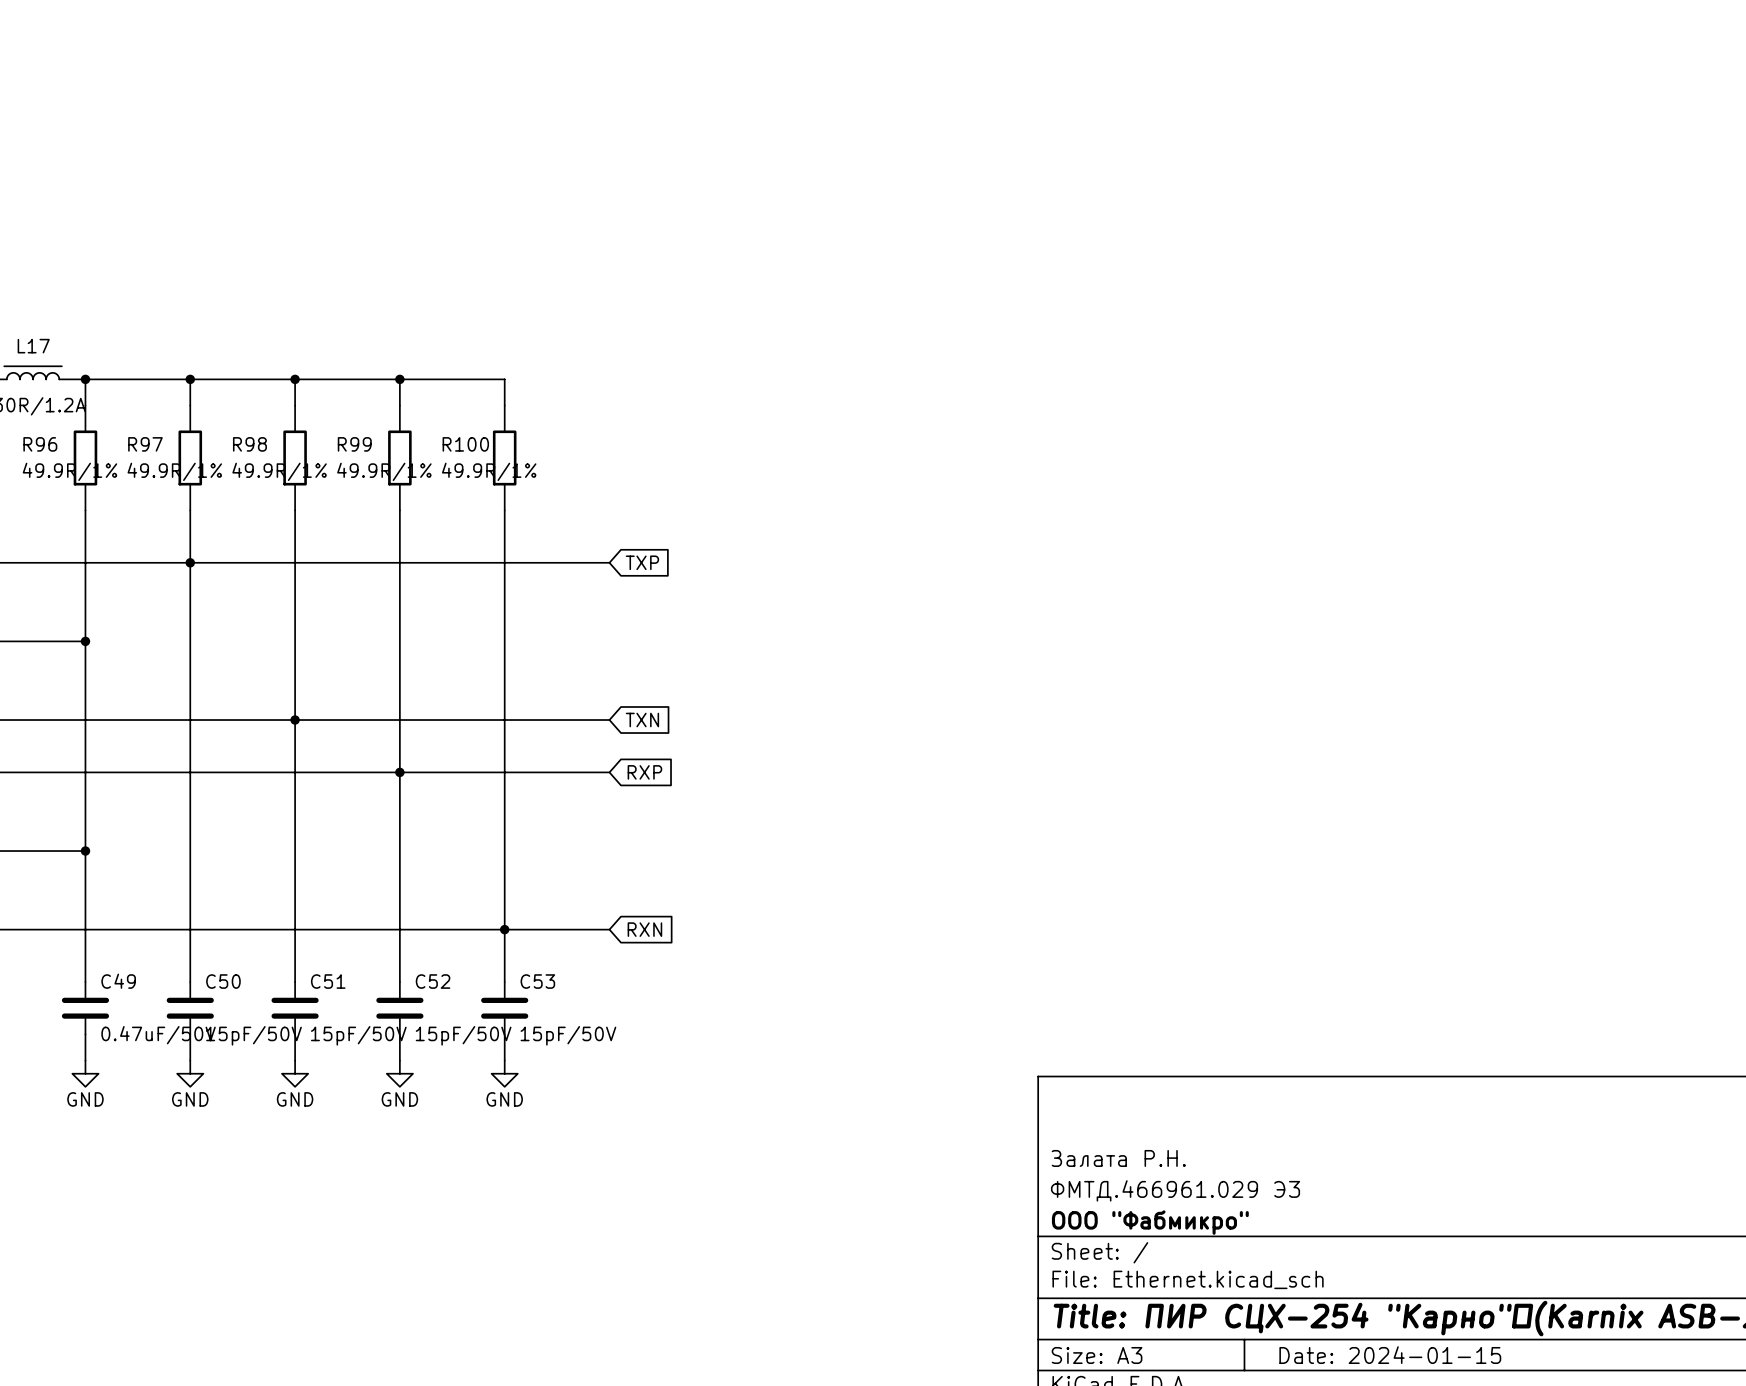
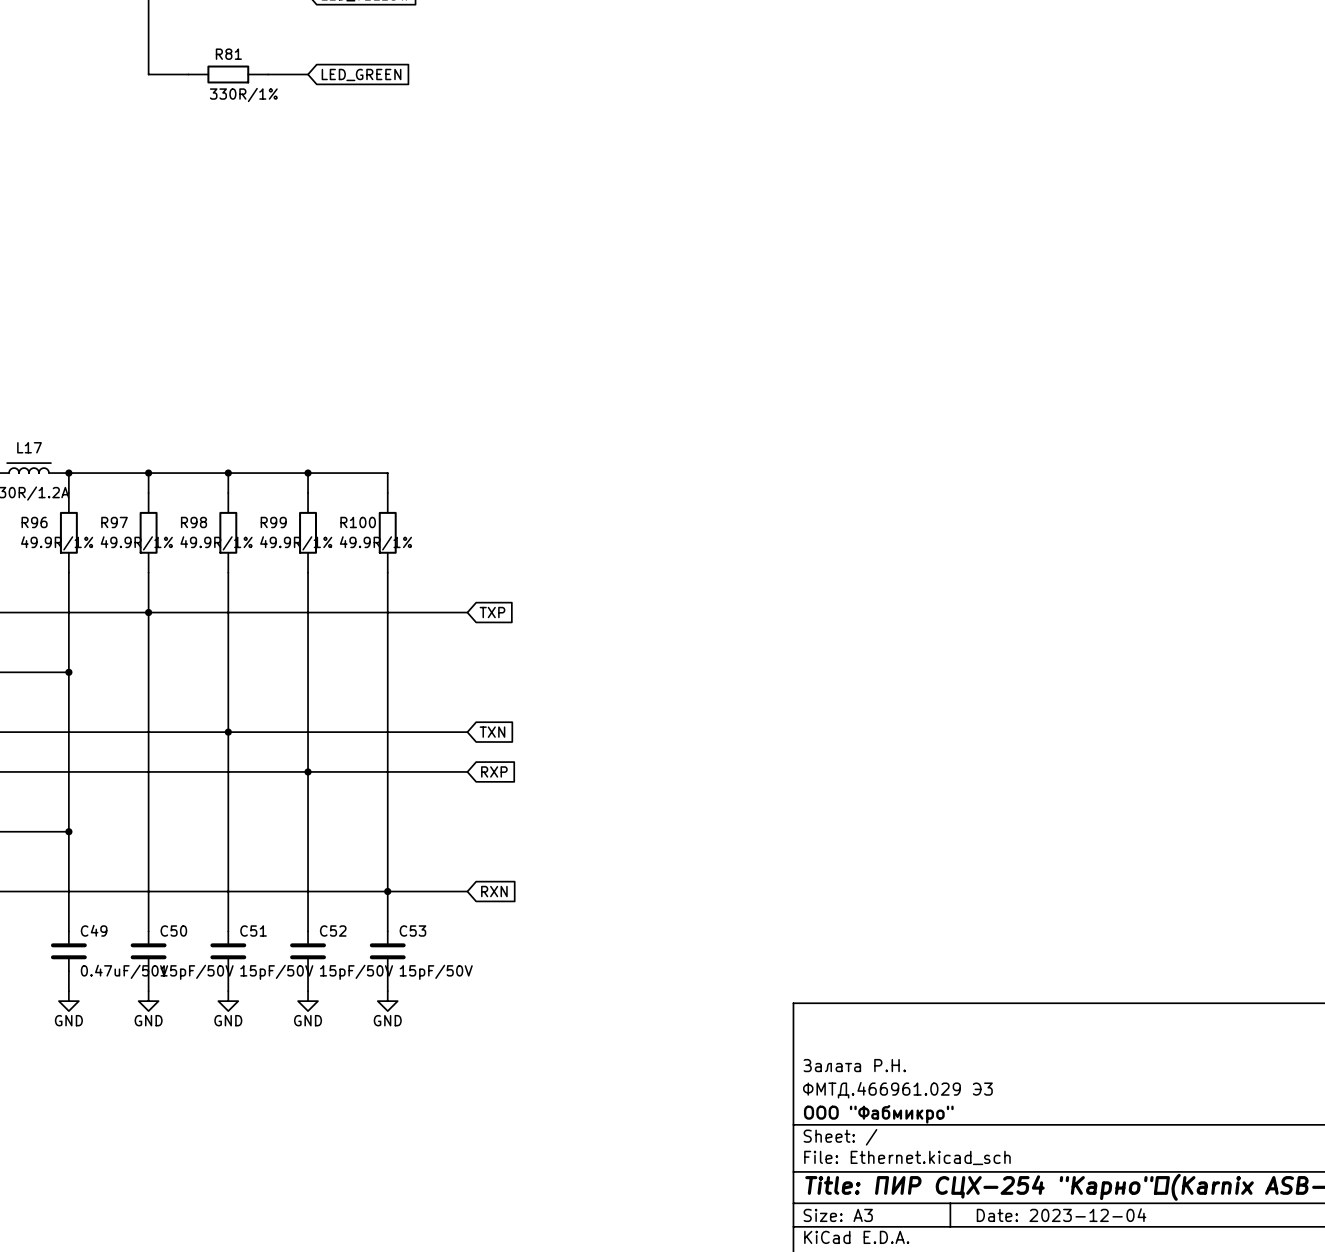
title block: Date: 2024-01-15 (1390, 1355) -> Date: 2023-12-04 (1061, 1215)

